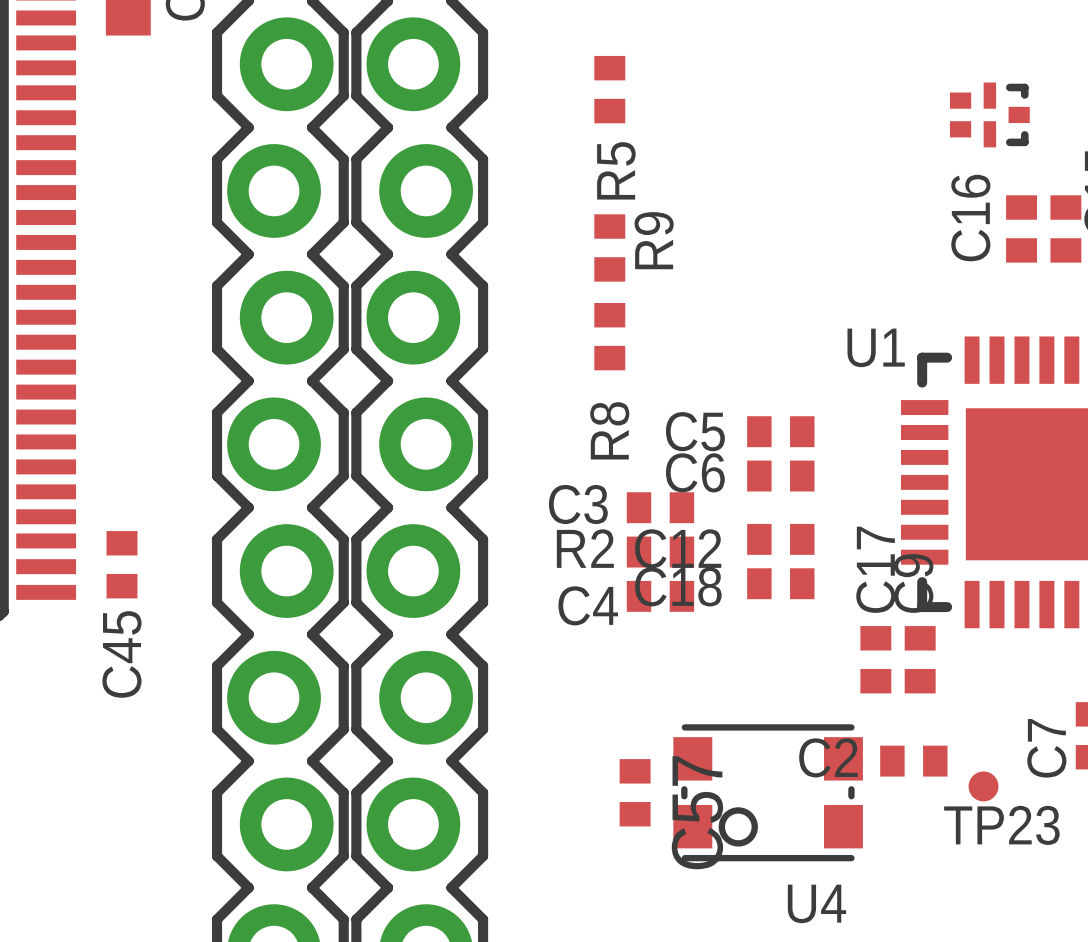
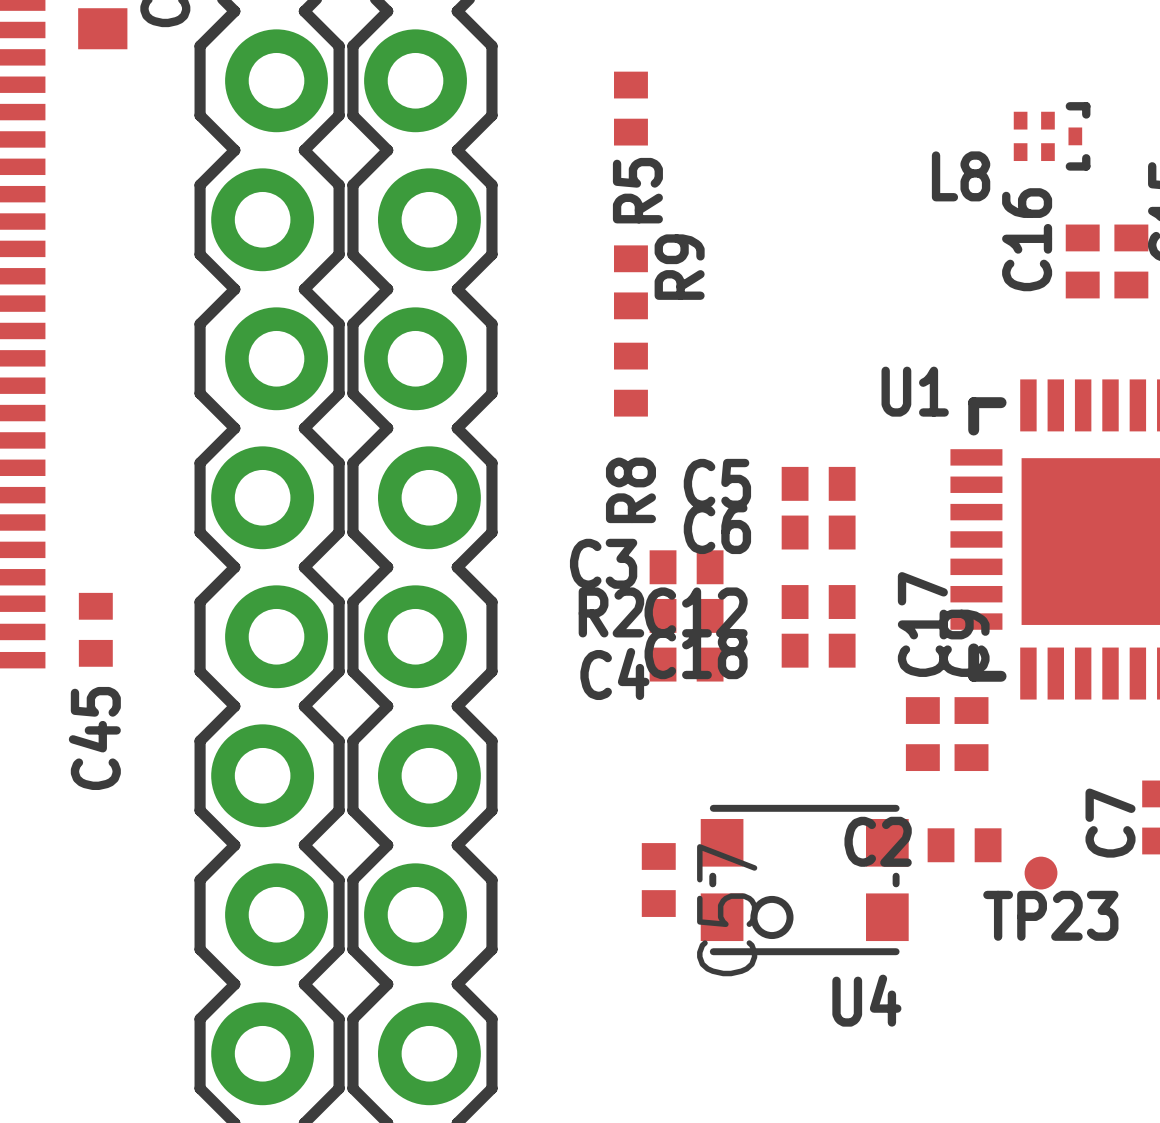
part: (989, 114) -> none
L8: none -> (1052, 136)

